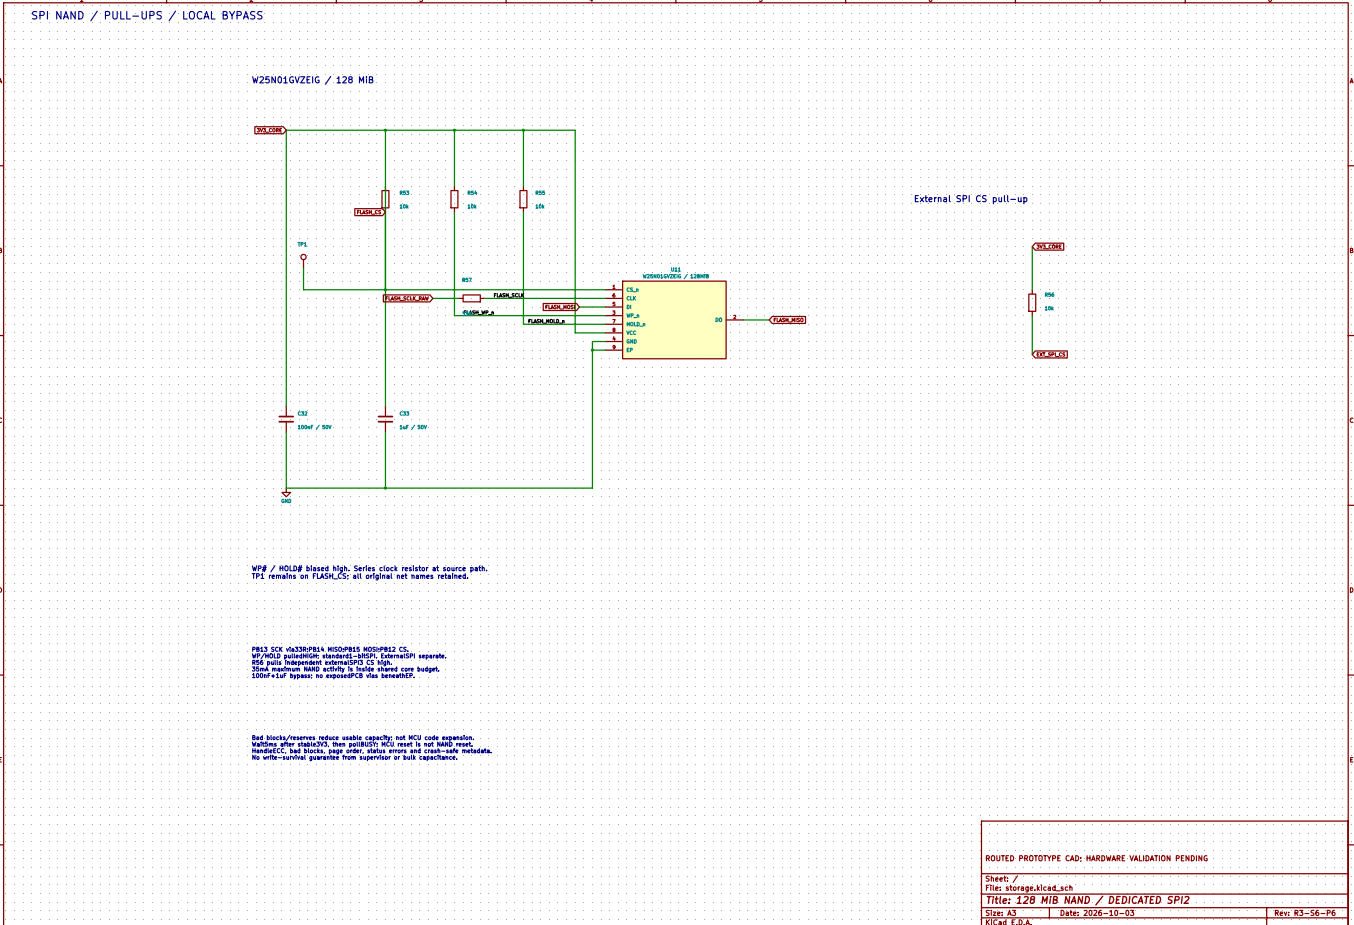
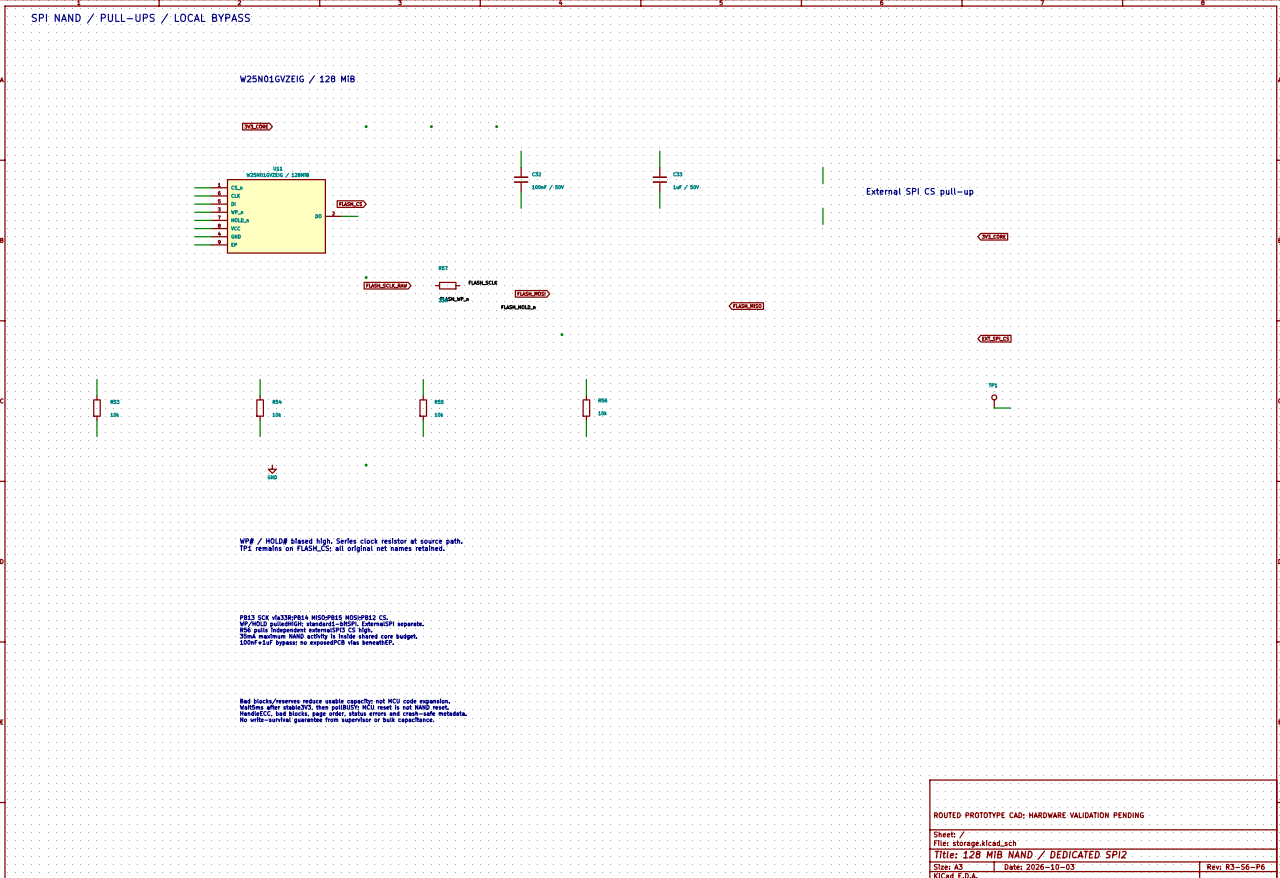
wire: (385, 130) (385, 406) -> none
wire: (454, 130) (454, 186) -> none
wire: (523, 130) (523, 186) -> none
wire: none -> (521, 151) (521, 167)
wire: none -> (659, 151) (659, 167)
wire: none -> (822, 167) (822, 183)
wire: none -> (194, 187) (211, 187)
part position: (385, 199) -> (96, 408)
part position: (454, 199) -> (260, 408)
part position: (523, 199) -> (423, 408)
wire: none -> (521, 191) (521, 208)
wire: none -> (659, 191) (659, 208)
wire: none -> (194, 195) (211, 195)
wire: none -> (194, 204) (211, 204)
wire: (454, 212) (454, 315) (605, 315) -> none
wire: (523, 212) (523, 324) (605, 324) -> none
wire: none -> (822, 208) (822, 224)
wire: none -> (194, 212) (211, 212)
wire: none -> (341, 216) (357, 216)
wire: none -> (194, 220) (211, 220)
wire: none -> (194, 228) (211, 228)
wire: none -> (194, 236) (211, 236)
wire: (1032, 246) (1032, 289) -> none
wire: none -> (194, 244) (211, 244)
part position: (303, 261) -> (994, 401)
wire: (303, 268) (303, 289) (605, 289) -> none
wire: (432, 298) (458, 298) -> none
wire: (484, 298) (605, 298) -> none
part position: (1032, 302) -> (586, 408)
wire: (579, 307) (605, 307) -> none
wire: (1032, 315) (1032, 354) -> none
part position: (674, 319) -> (276, 216)
wire: (743, 319) (769, 319) -> none
wire: (605, 332) (575, 332) (575, 130) (286, 130) (286, 406) -> none
wire: (605, 341) (592, 341) (592, 488) (286, 488) (286, 432) -> none
wire: (592, 350) (605, 350) -> none
wire: none -> (96, 379) (96, 395)
wire: none -> (260, 379) (260, 395)
wire: none -> (423, 379) (423, 395)
wire: none -> (586, 379) (586, 395)
part position: (286, 419) -> (521, 179)
part position: (385, 419) -> (659, 179)
wire: none -> (994, 408) (1010, 408)
wire: (385, 432) (385, 488) -> none
wire: none -> (96, 420) (96, 436)
wire: none -> (260, 420) (260, 436)
wire: none -> (423, 420) (423, 436)
wire: none -> (586, 420) (586, 436)

